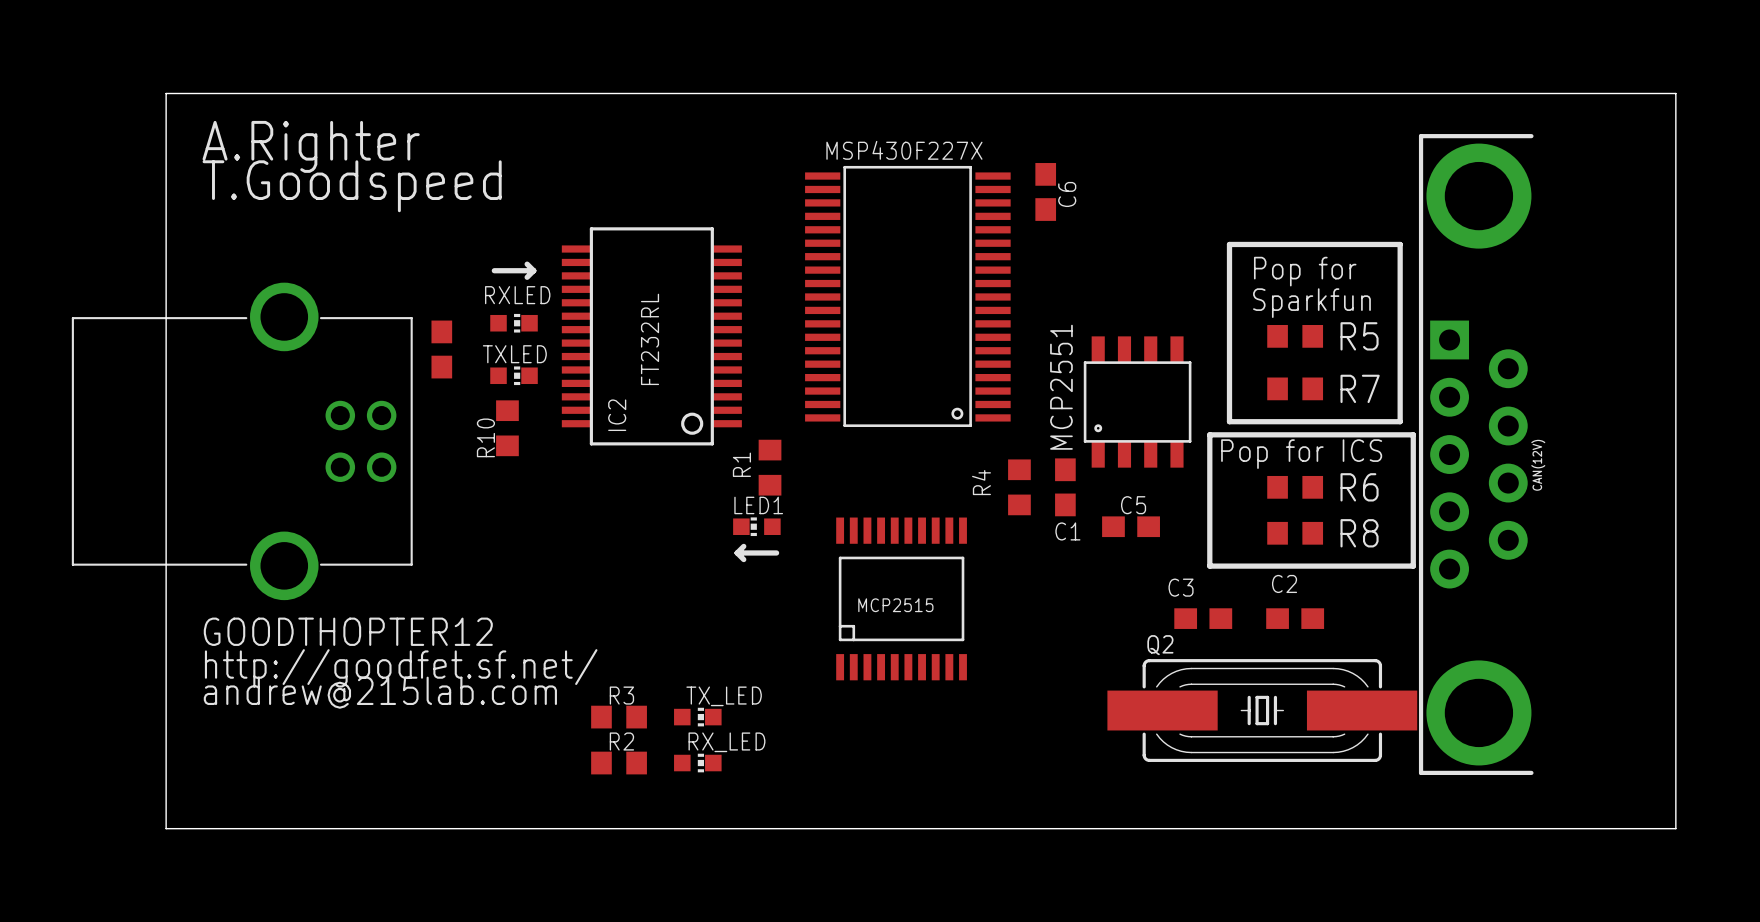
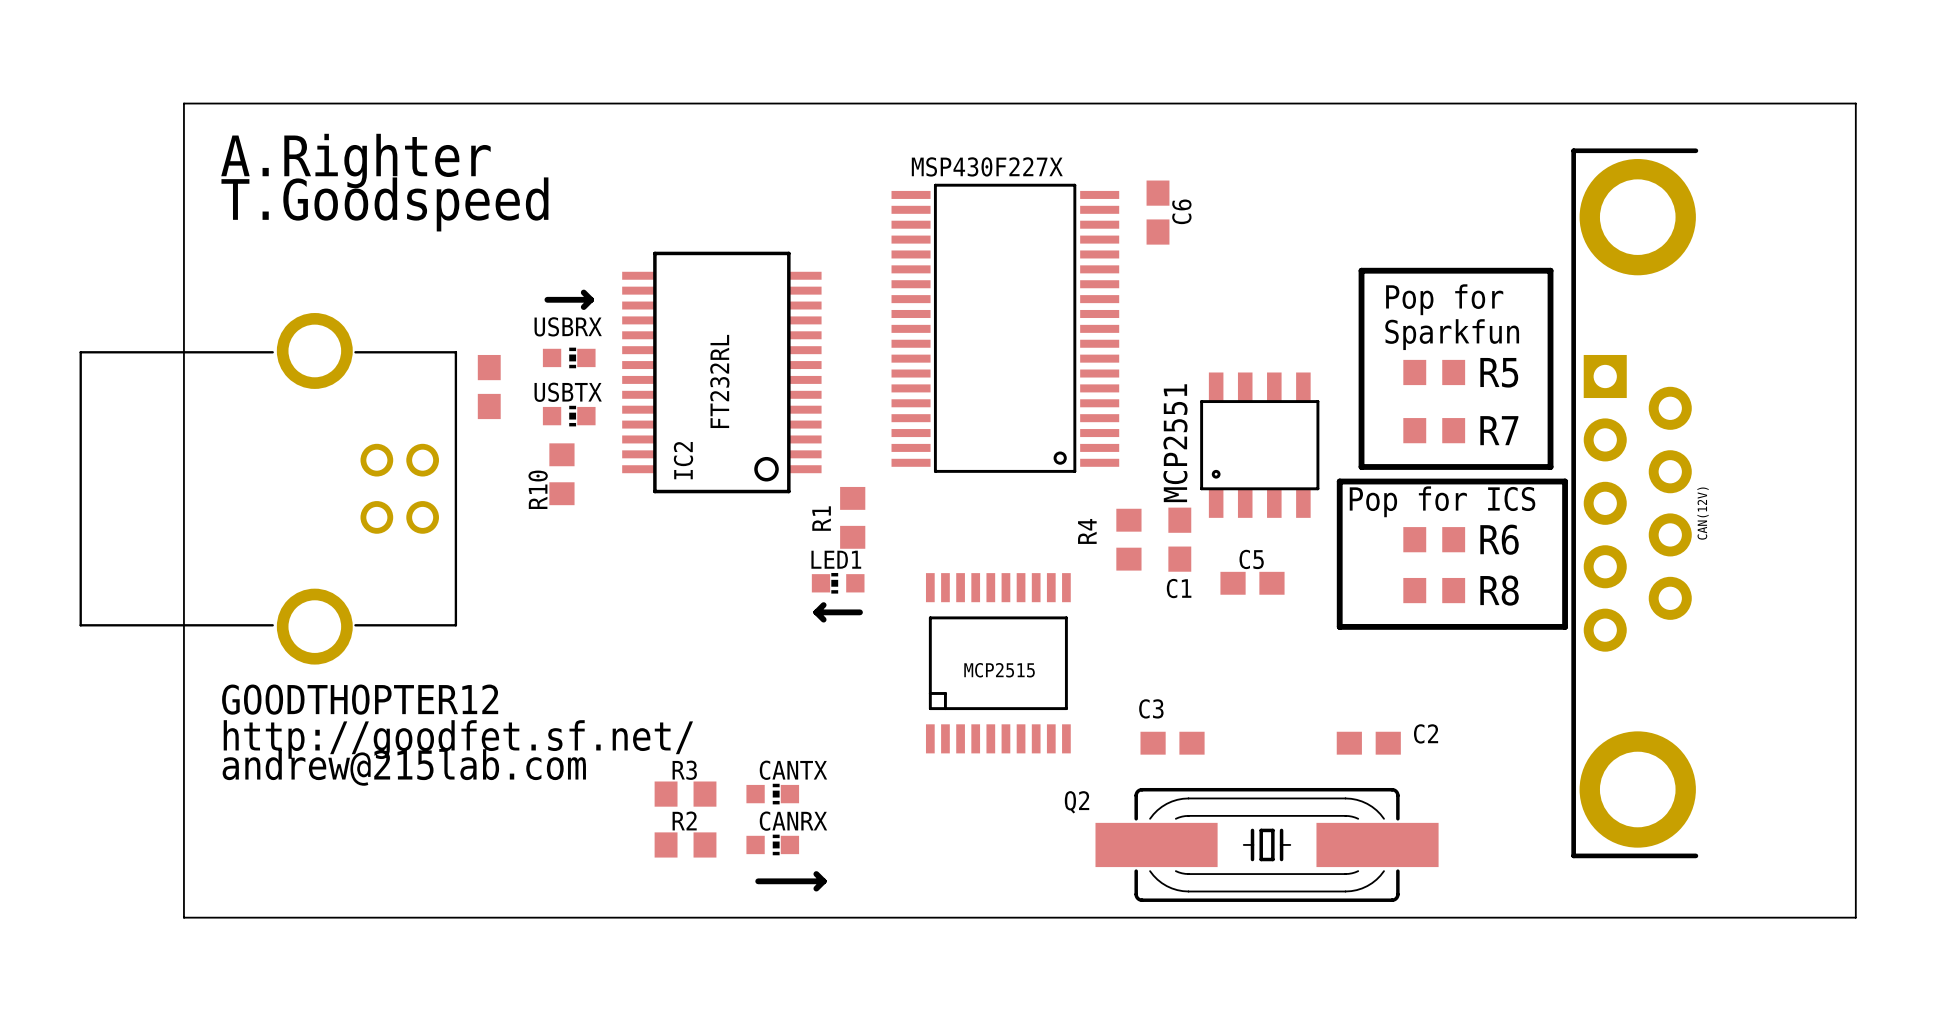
RXLED name: RXLED (517, 295) -> USBRX (568, 326)
TXLED name: TXLED (514, 354) -> USBTX (568, 392)
C2 name position: C2 (1284, 583) -> C2 (1426, 733)
C3 position: (1203, 618) -> (1172, 743)
C2 position: (1295, 618) -> (1368, 743)
Q2 name position: Q2 (1160, 645) -> Q2 (1077, 802)
TX_LED name: TX_LED (724, 696) -> CANTX (793, 770)
Q2 position: (1262, 710) -> (1267, 844)
RX_LED name: RX_LED (726, 742) -> CANRX (793, 821)
line: none -> (816, 874) (823, 881)
line: none -> (758, 881) (823, 881)
line: none -> (823, 881) (816, 888)

